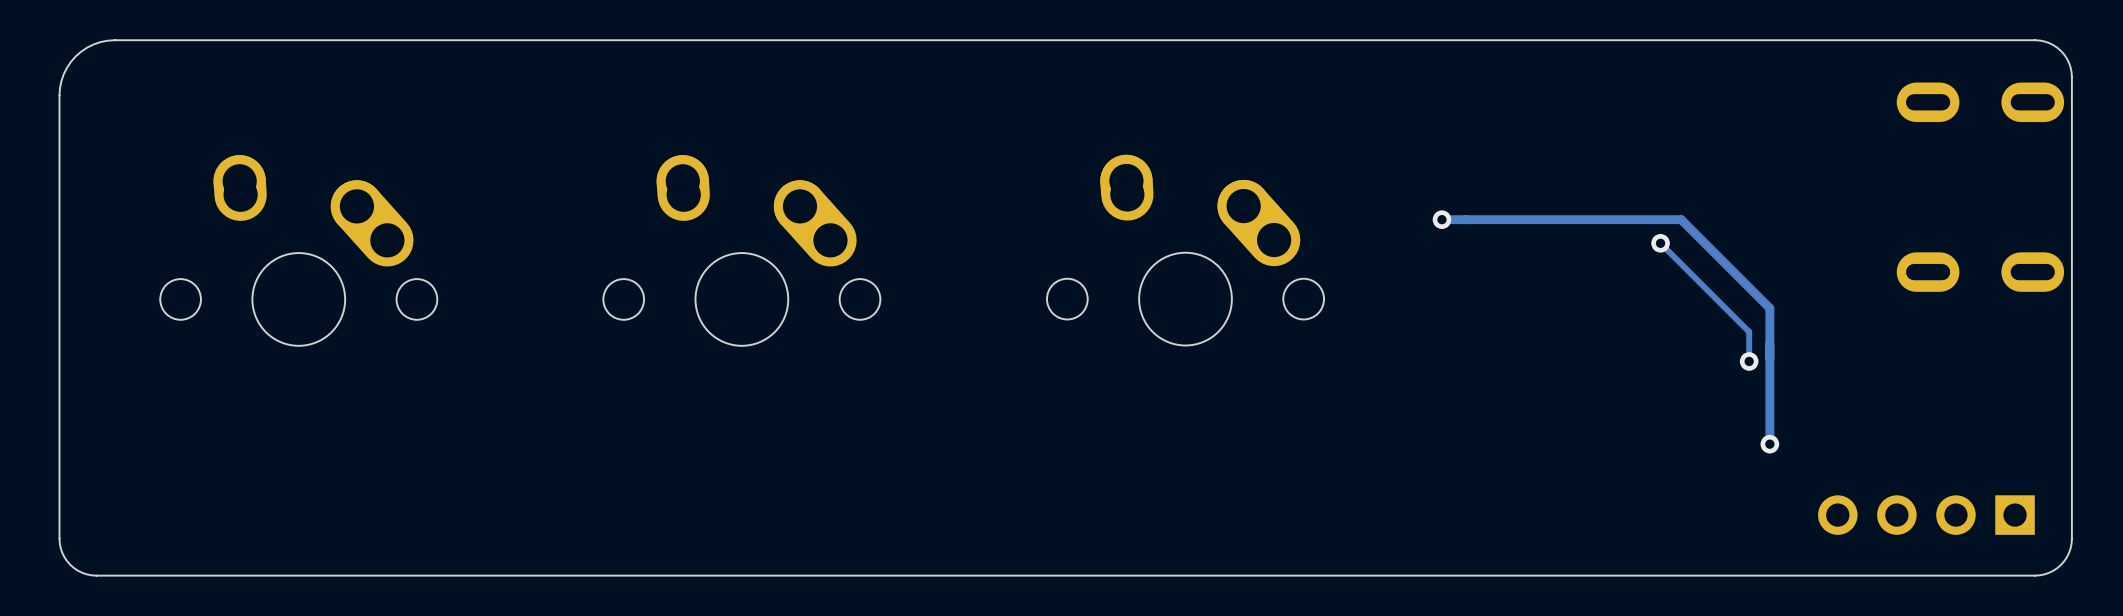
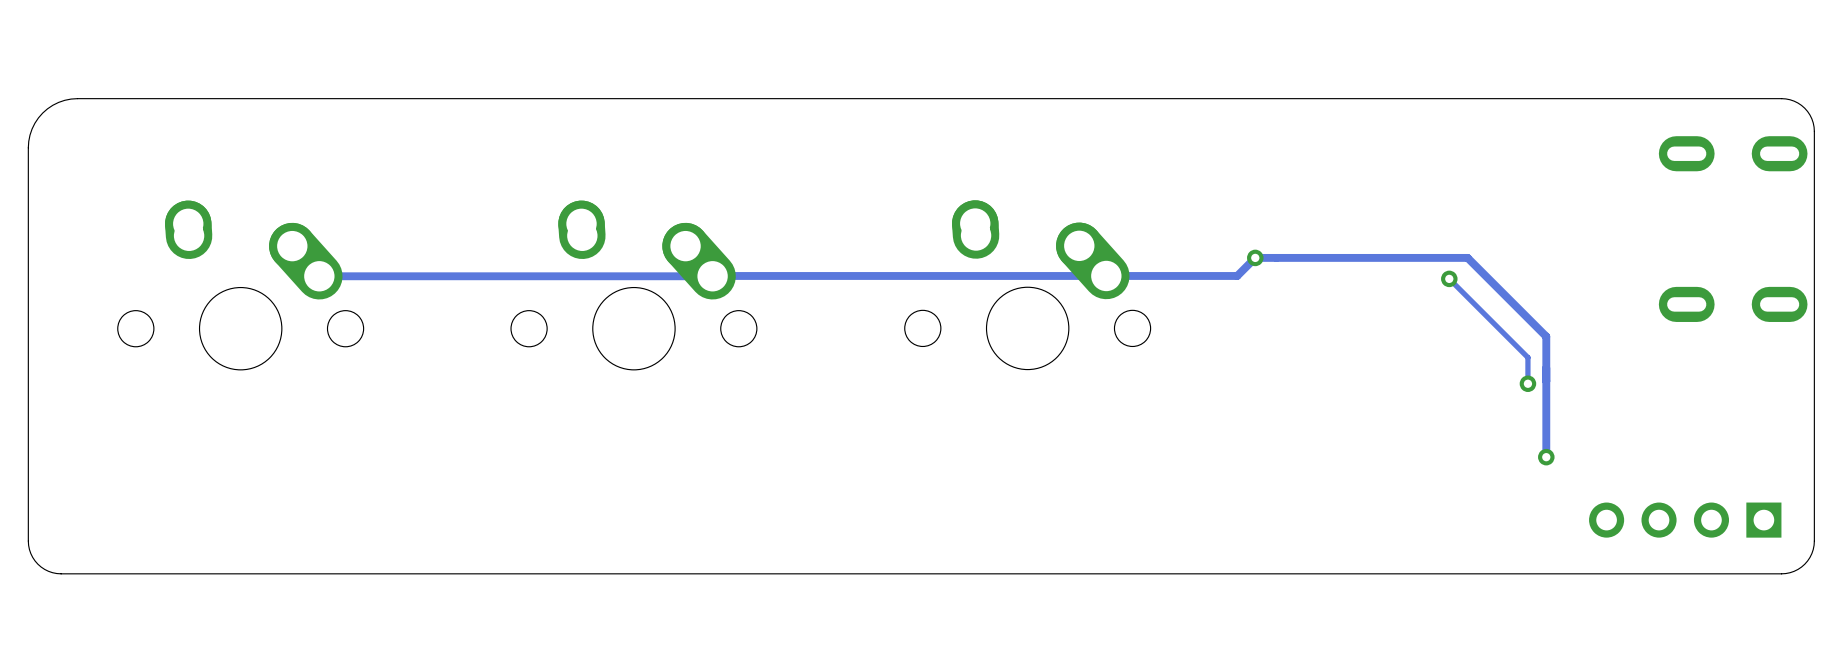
track: none -> (1255, 257) (1237, 275) (712, 275)
track: none -> (712, 276) (319, 276)

